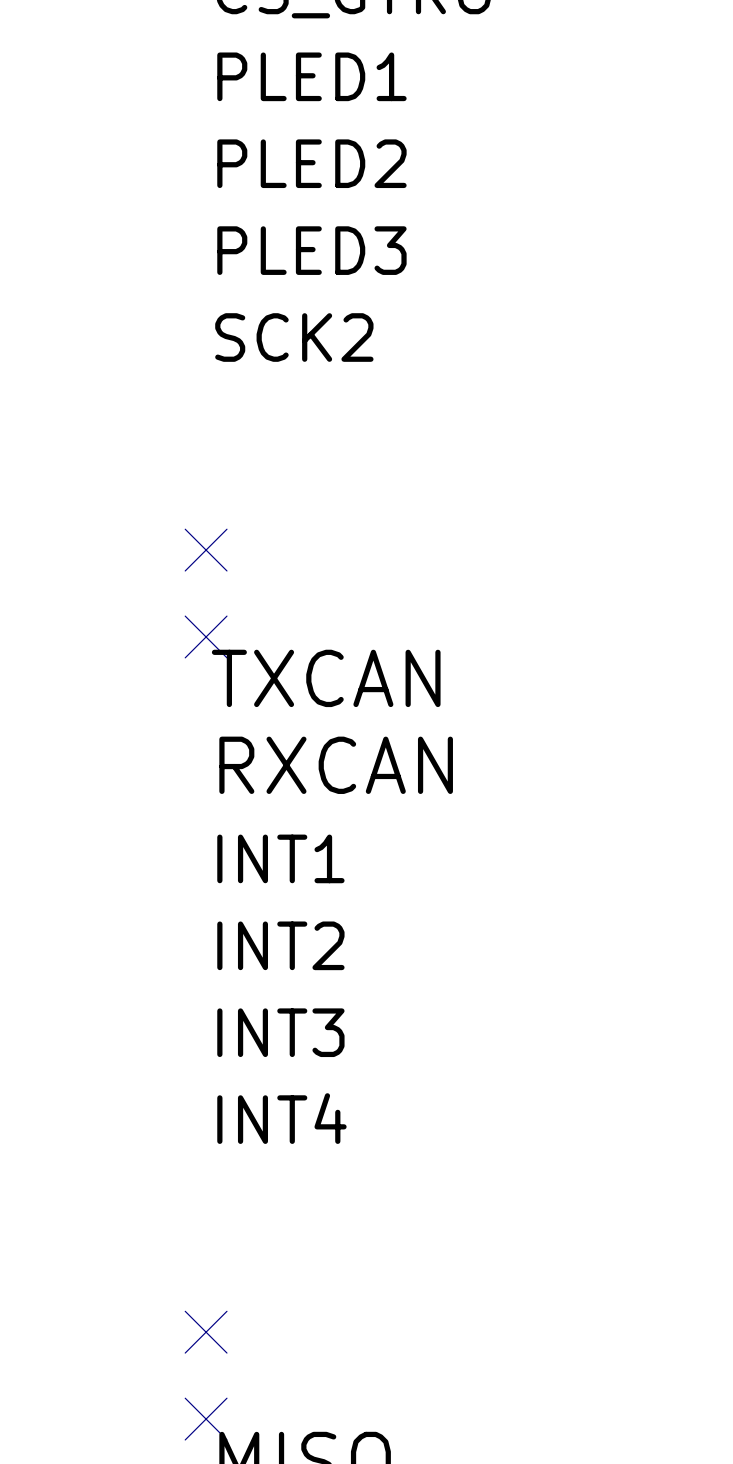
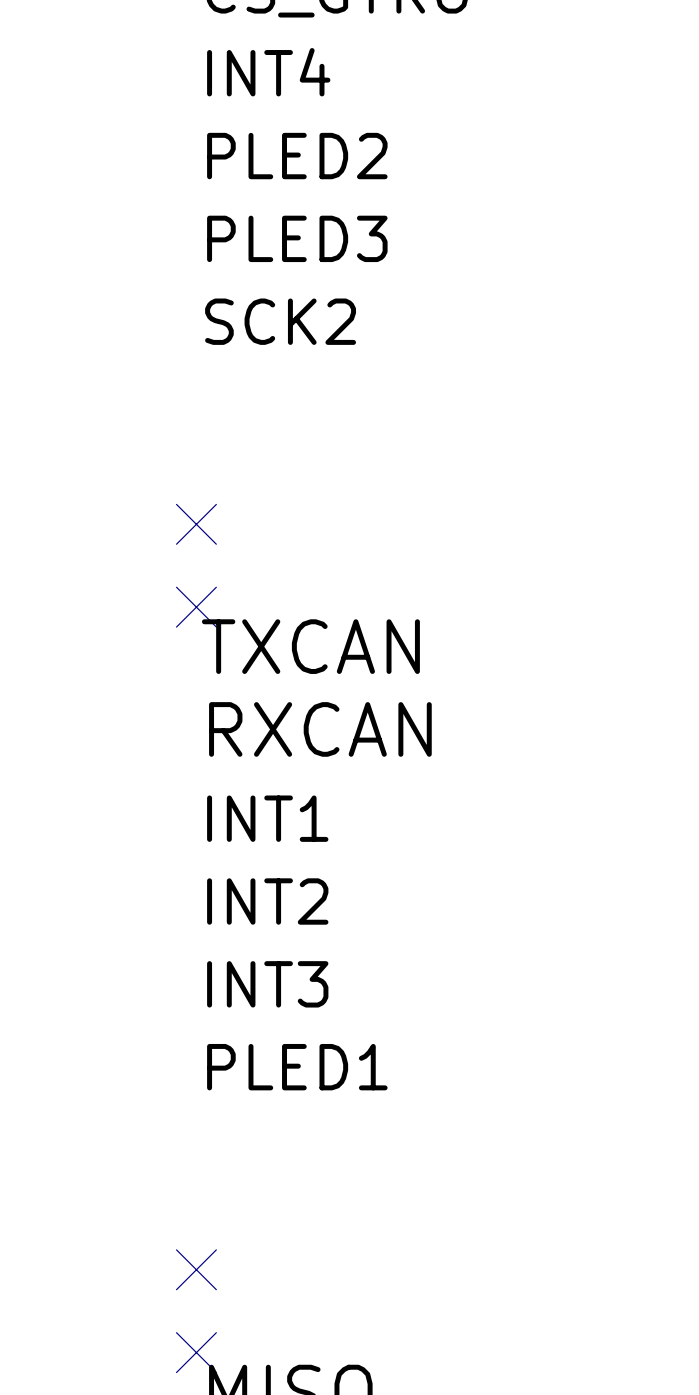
label: PLED1 (311, 76) -> INT4 (268, 72)
label: INT4 (281, 1118) -> PLED1 (297, 1067)

